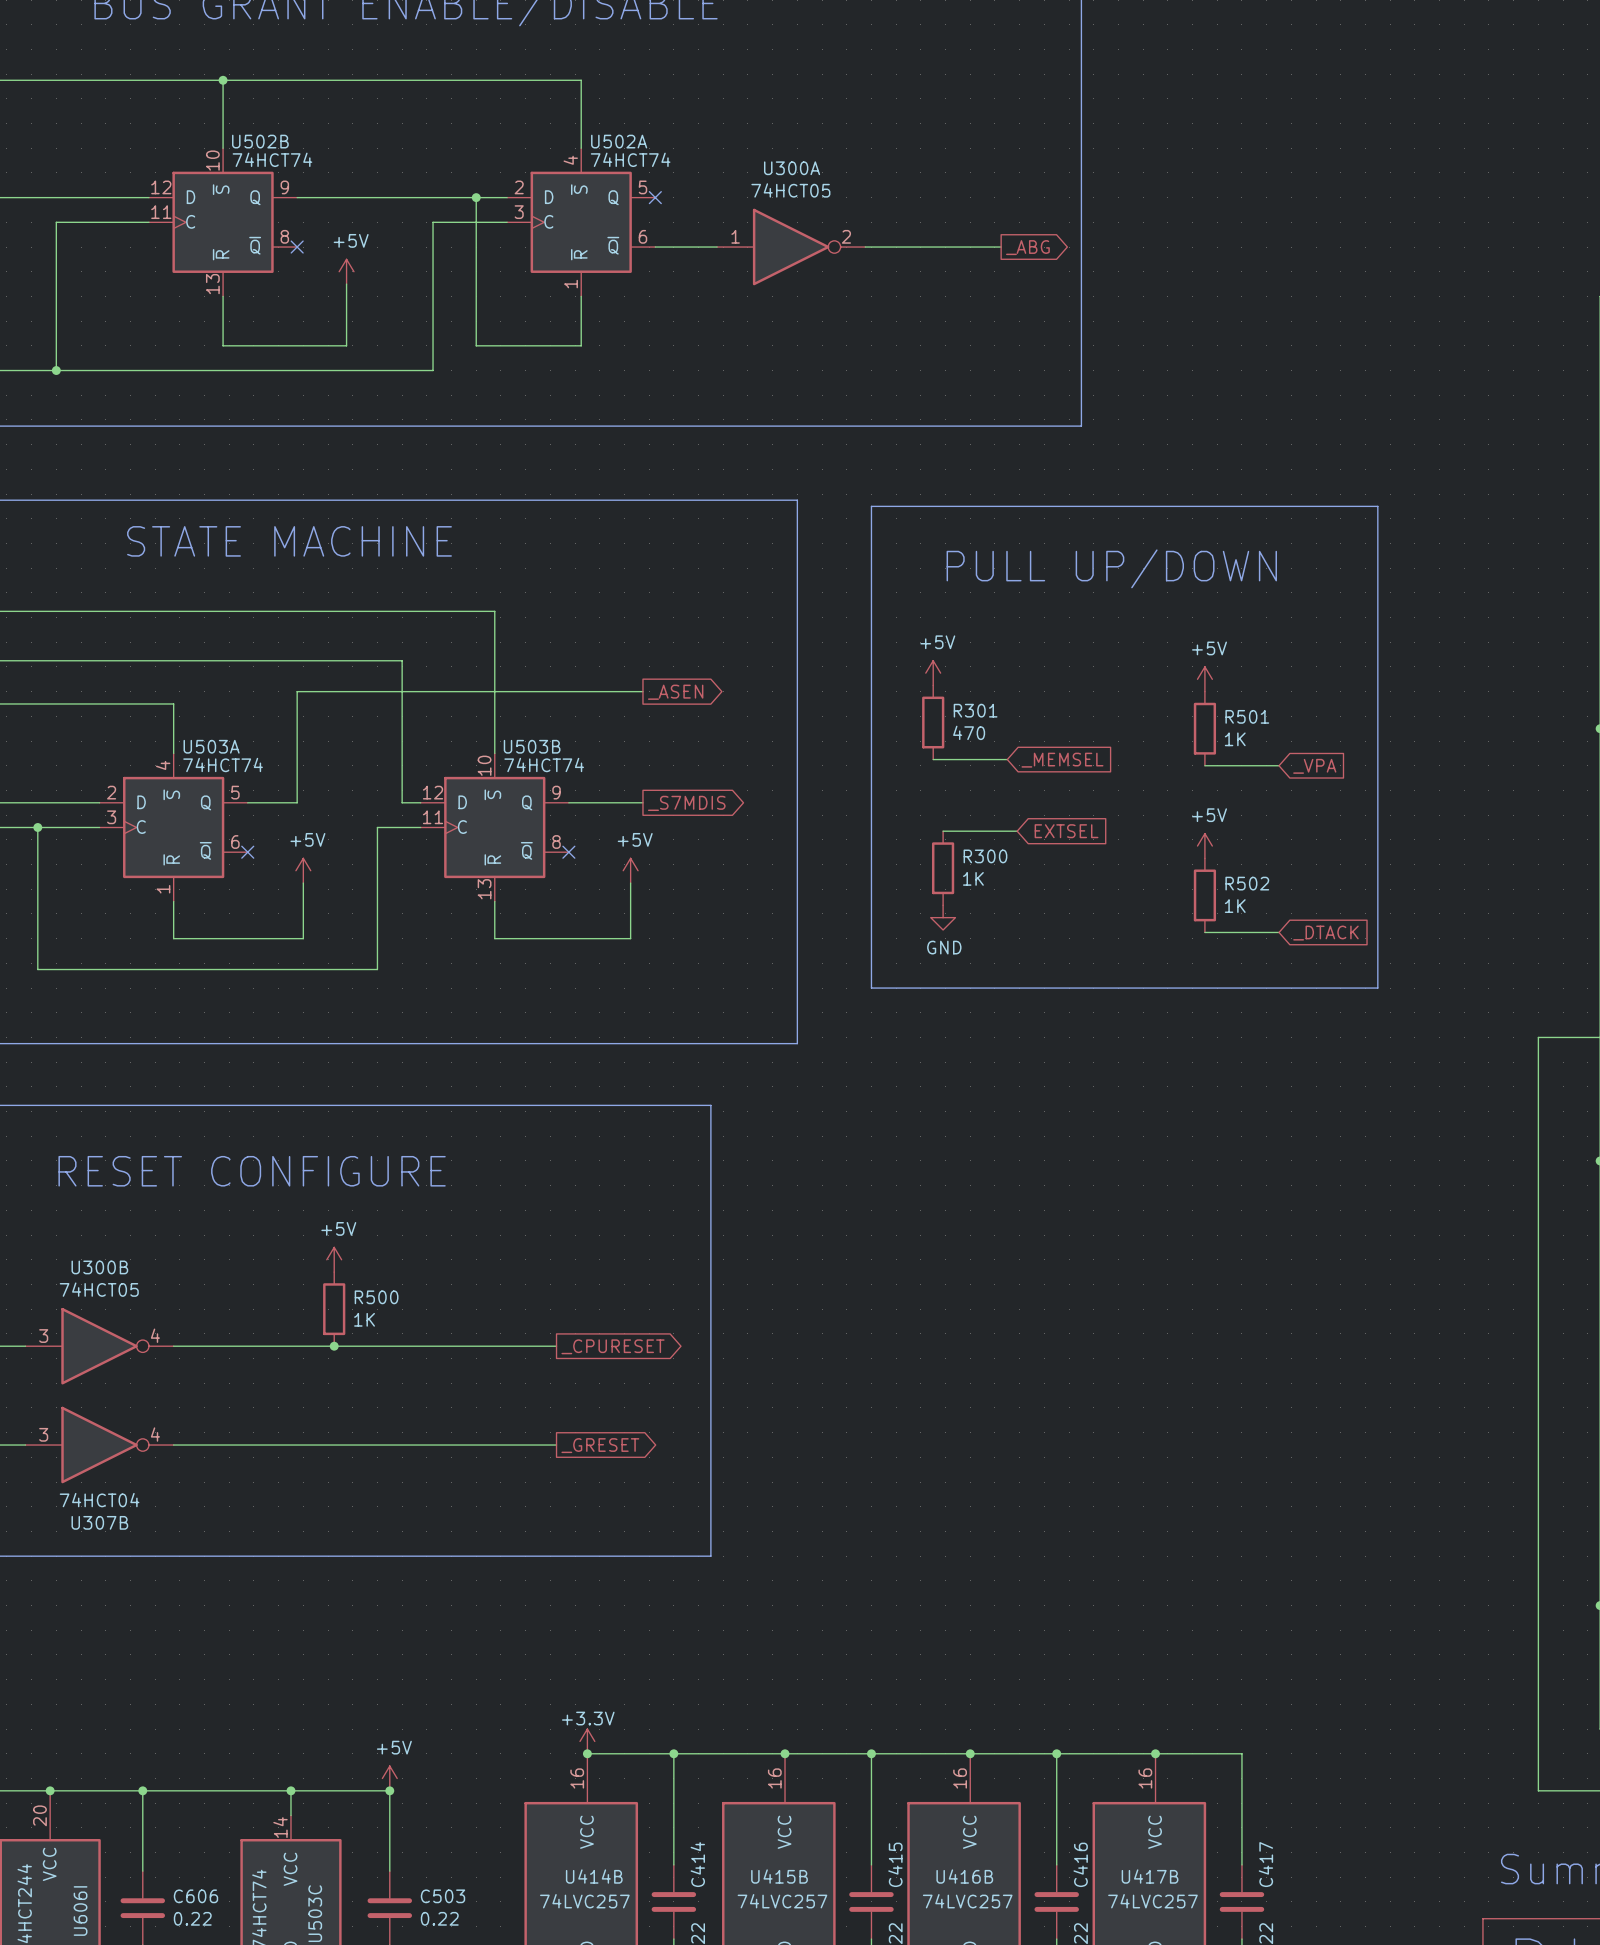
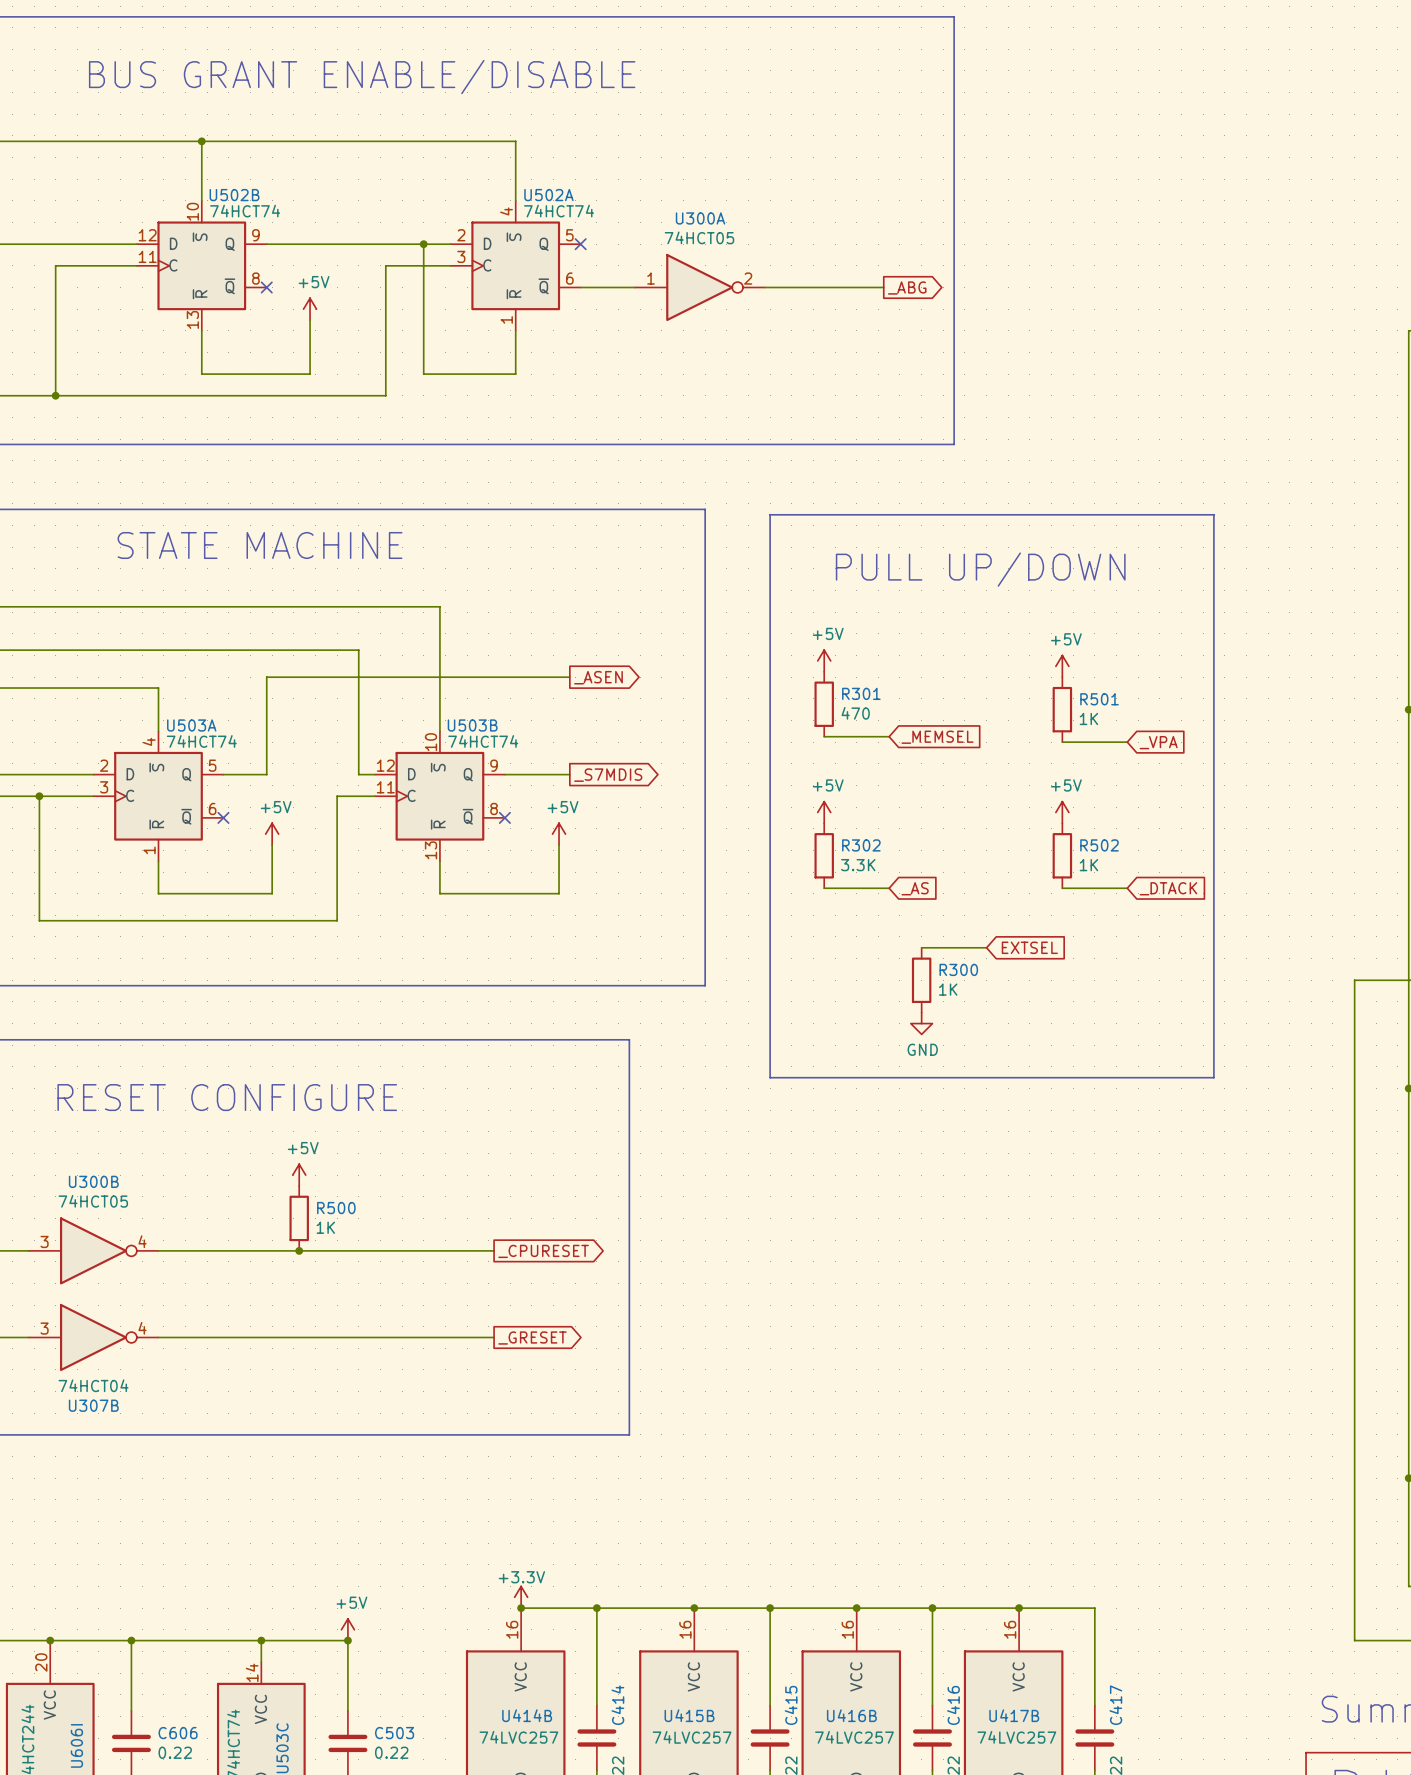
wire: (943, 831) (1017, 831) -> (824, 888) (889, 888)
global label position: EXTSEL (1066, 831) -> EXTSEL (1029, 947)
power symbol: none -> +5V (824, 812)
R300 position: (943, 868) -> (921, 980)
R302: none -> 3.3K (824, 855)
power symbol position: GND (943, 917) -> GND (921, 1023)
global label: none -> _AS (915, 888)
line: (871, 988) (1377, 988) -> (770, 936) (770, 1077) (1213, 1077) (1213, 936)
wire: none -> (921, 947) (986, 947)

